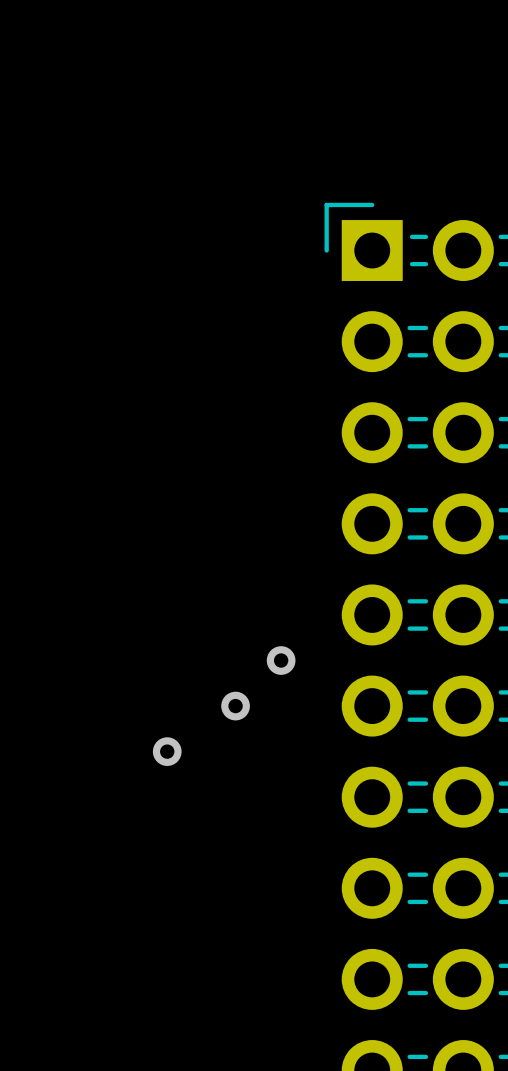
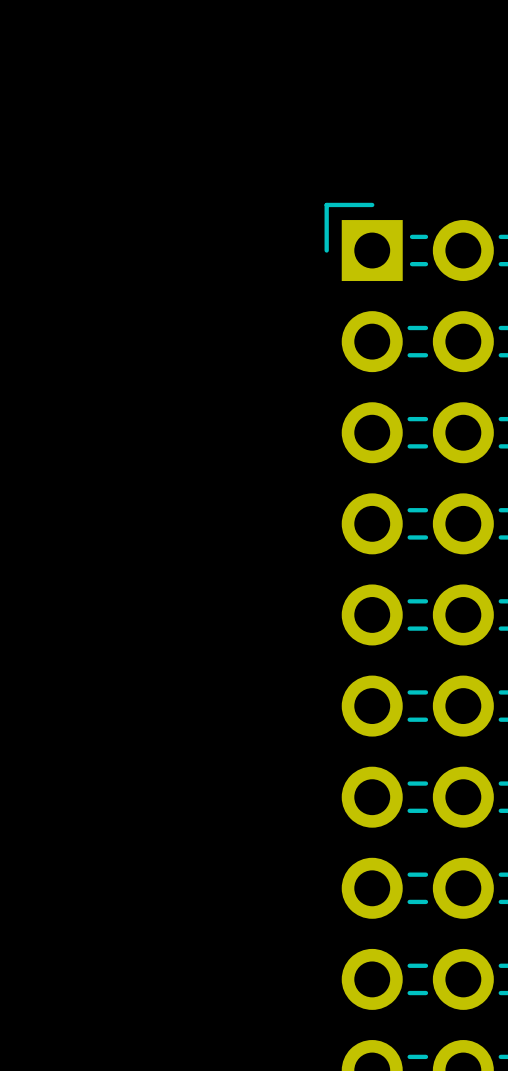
via: (281, 660) -> none
via: (235, 706) -> none
via: (167, 751) -> none

